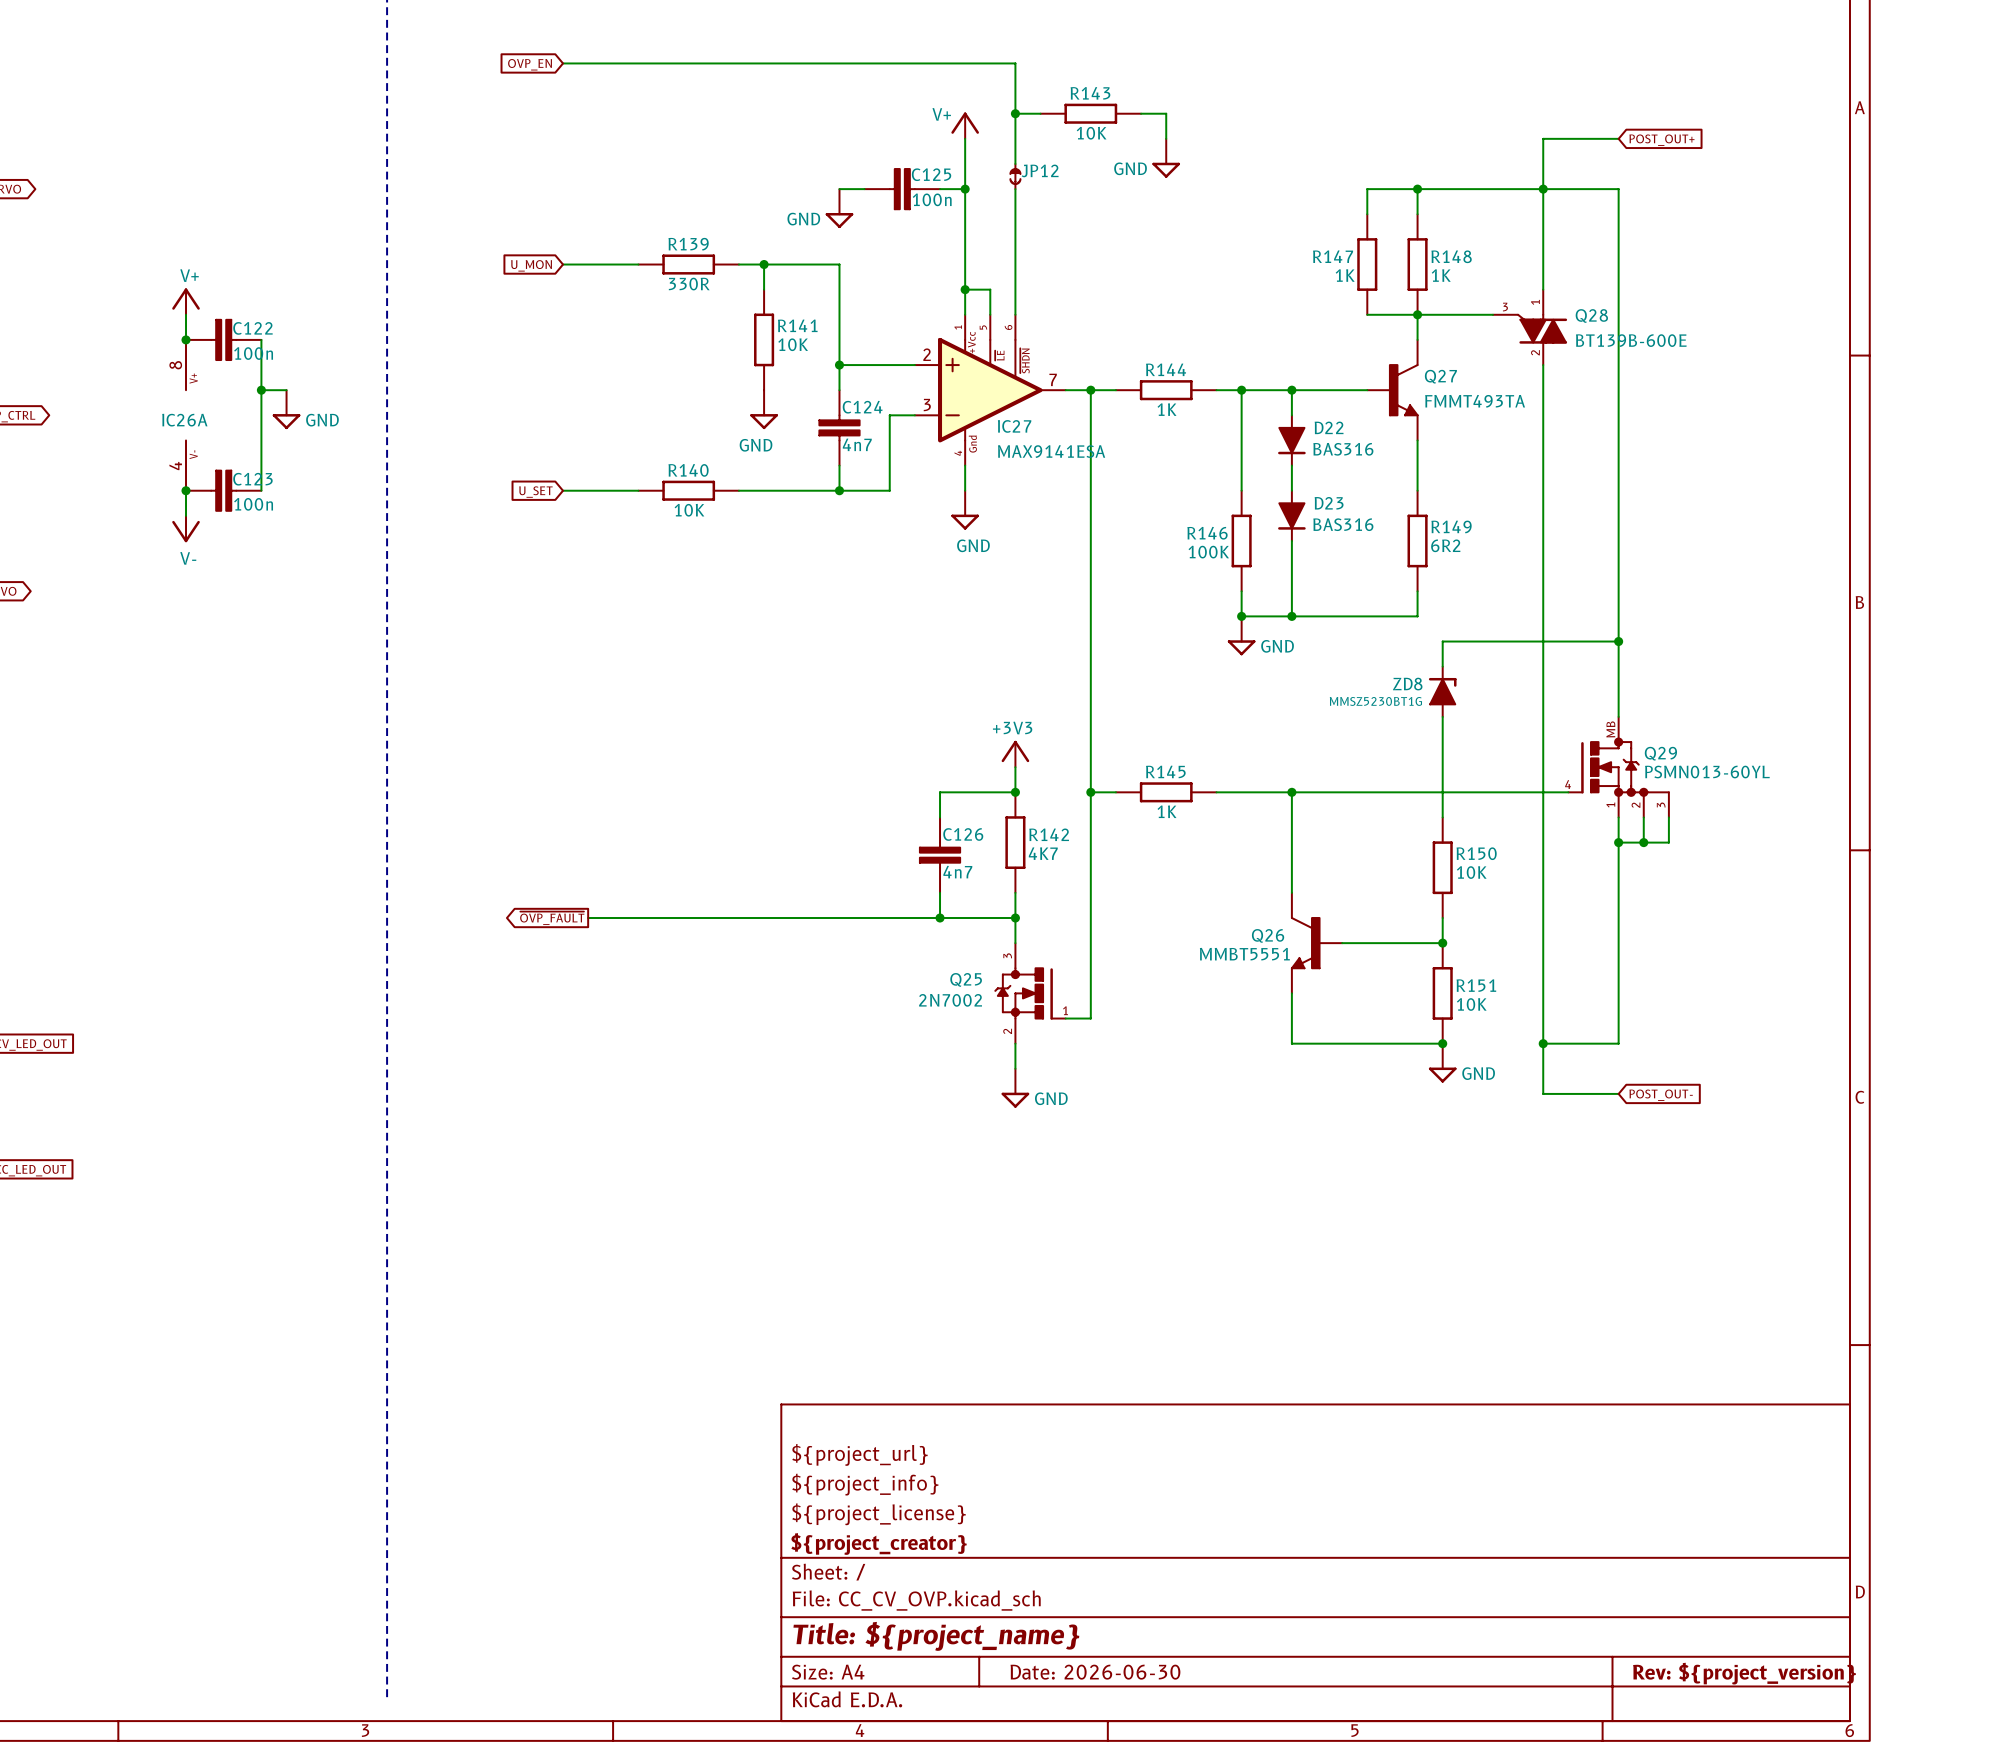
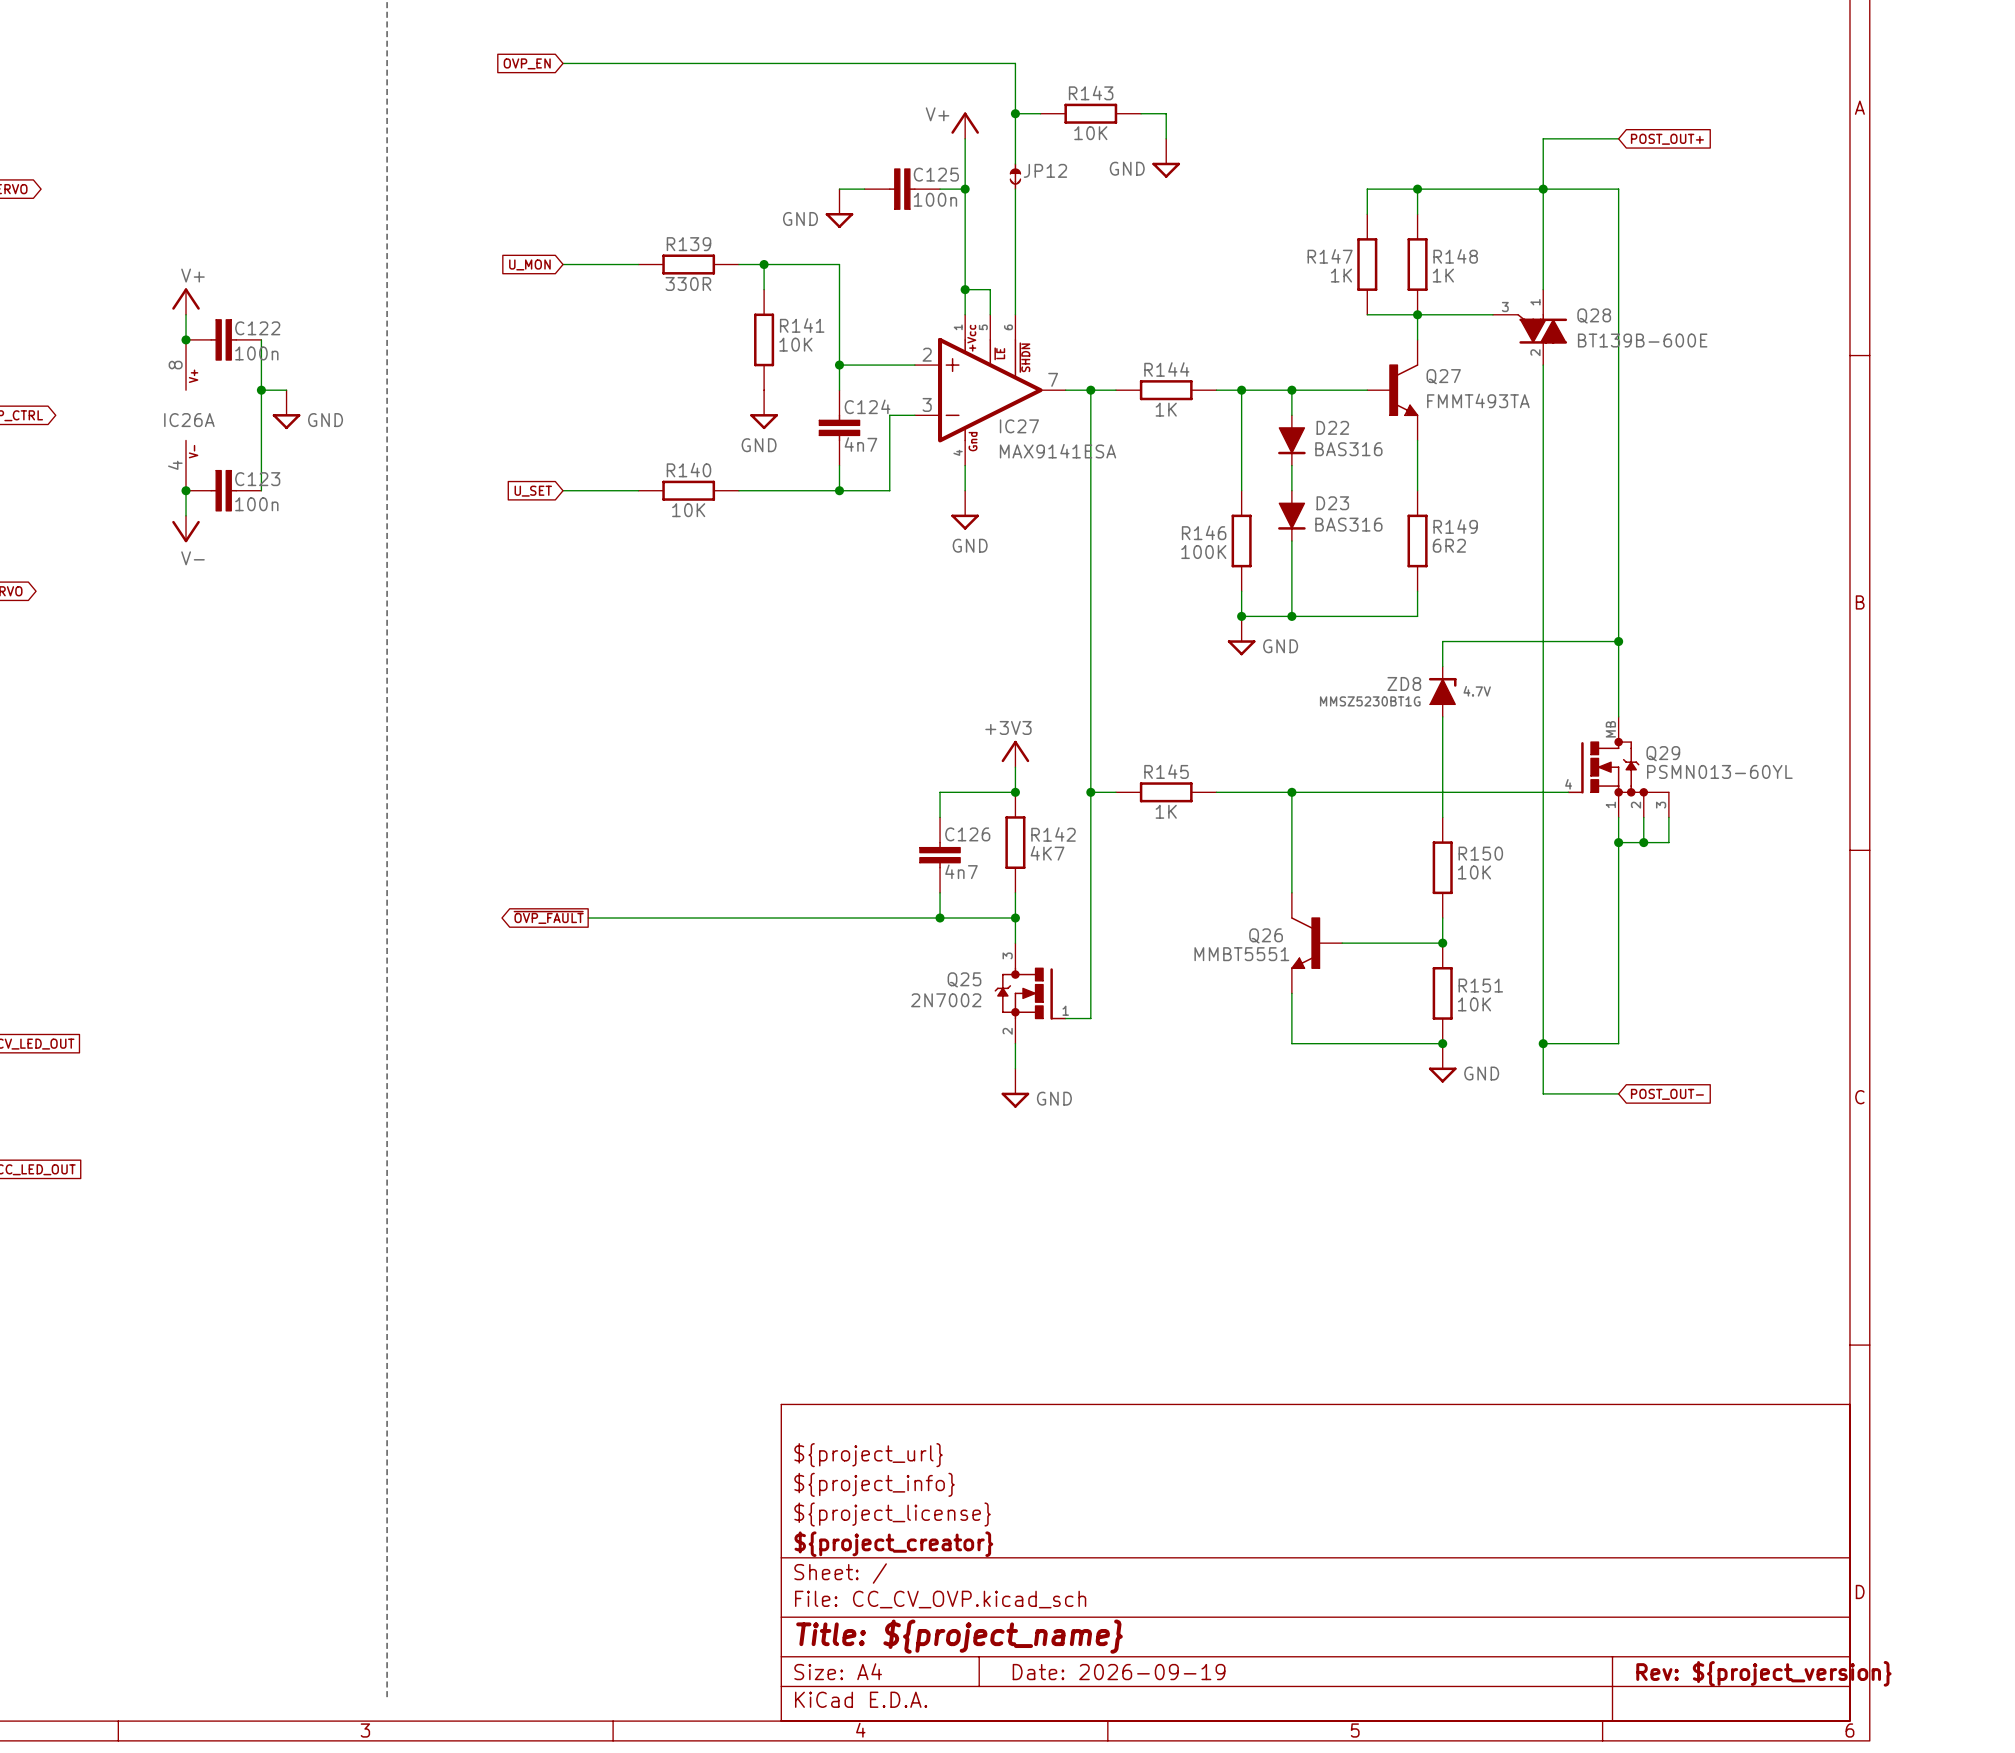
ZD8 text: none -> 4.7V (1477, 691)
title block: Date: 2026-06-30 (1095, 1672) -> Date: 2026-09-19 (1119, 1672)

